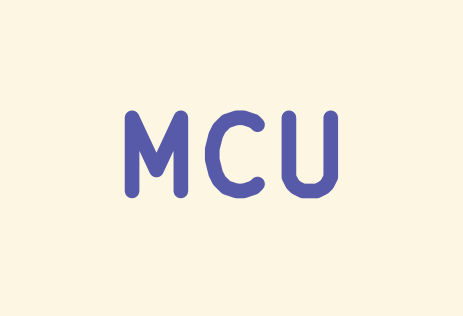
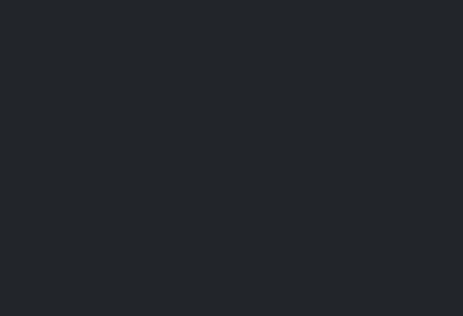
text: MCU (231, 154) -> none

